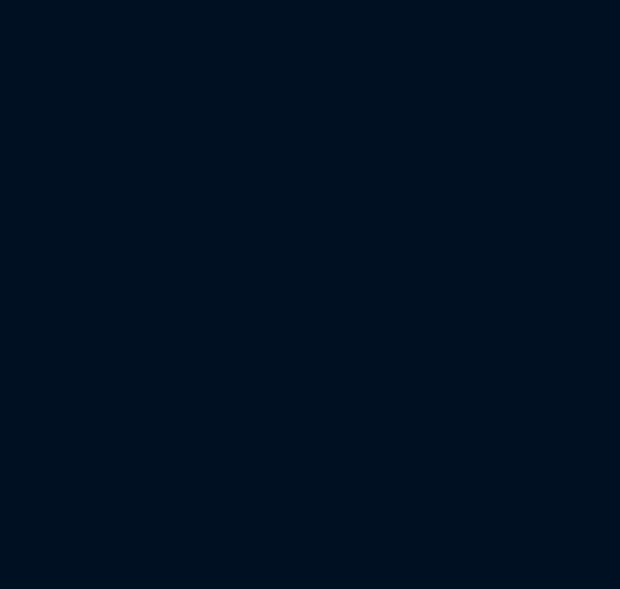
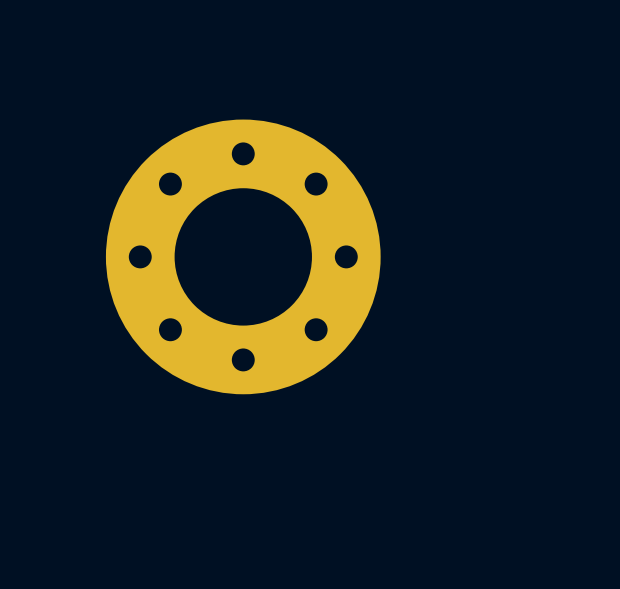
part: none -> (243, 256)

